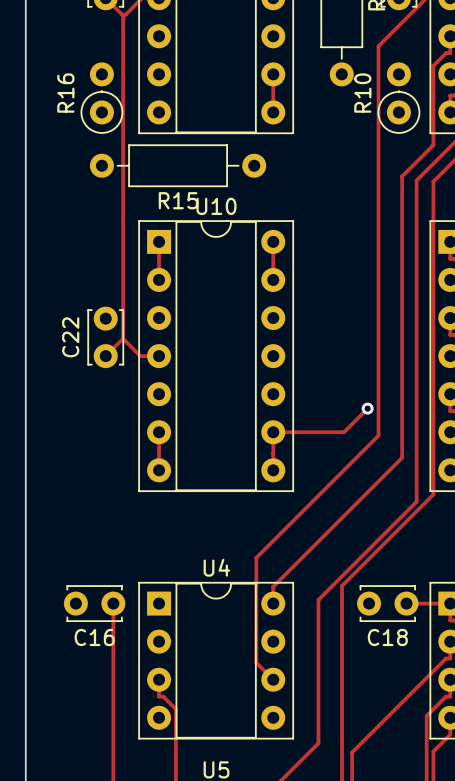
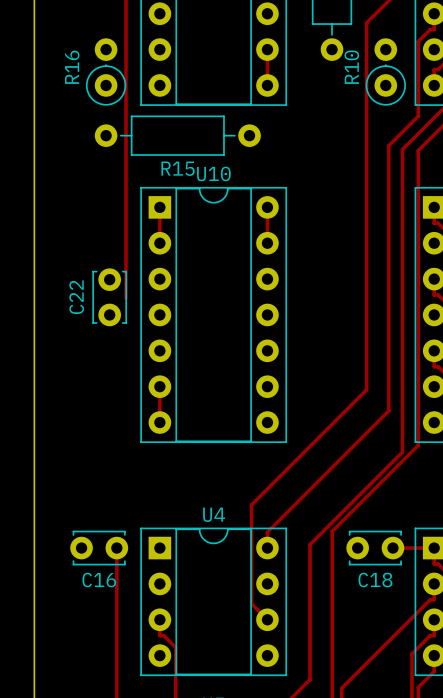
track: (105, 356) (123, 338) (140, 356) (159, 356) -> none
track: (367, 408) (344, 432) (273, 432) (273, 470) -> none
via: (367, 408) -> none

